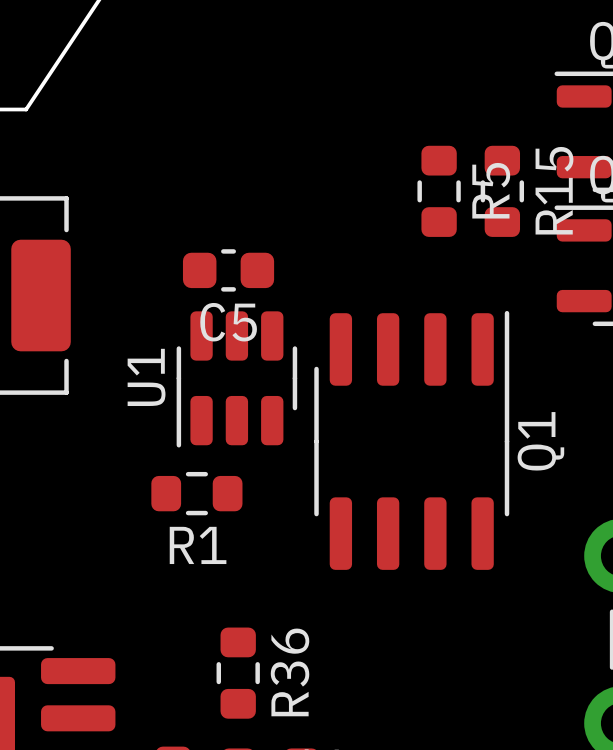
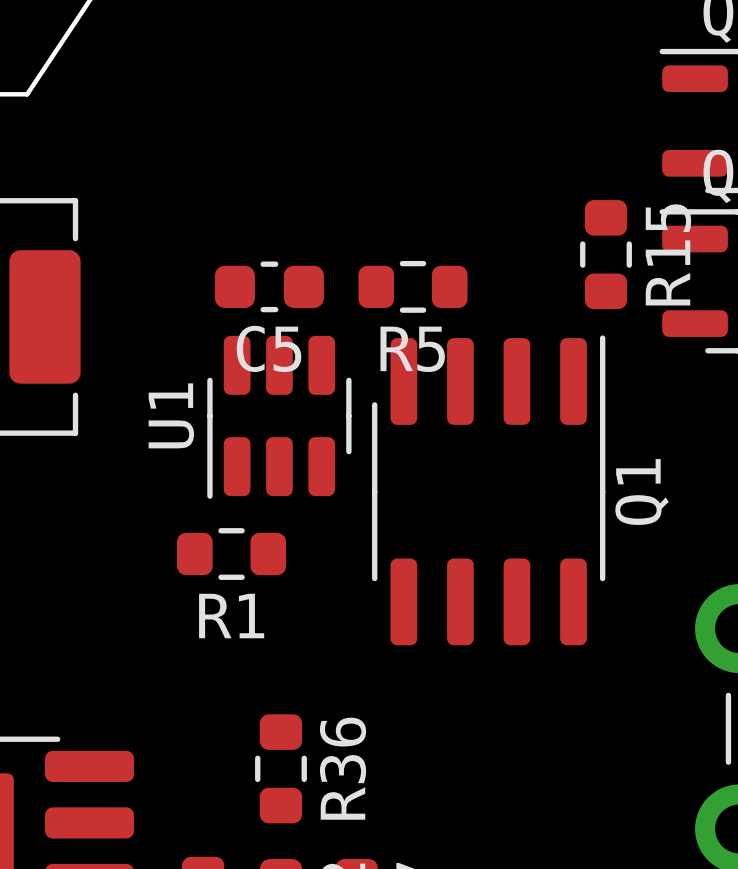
R5 rotation: 0° (439, 191) -> 90° clockwise (412, 286)
R5 position: (439, 191) -> (412, 286)
R15 position: (502, 191) -> (606, 254)

